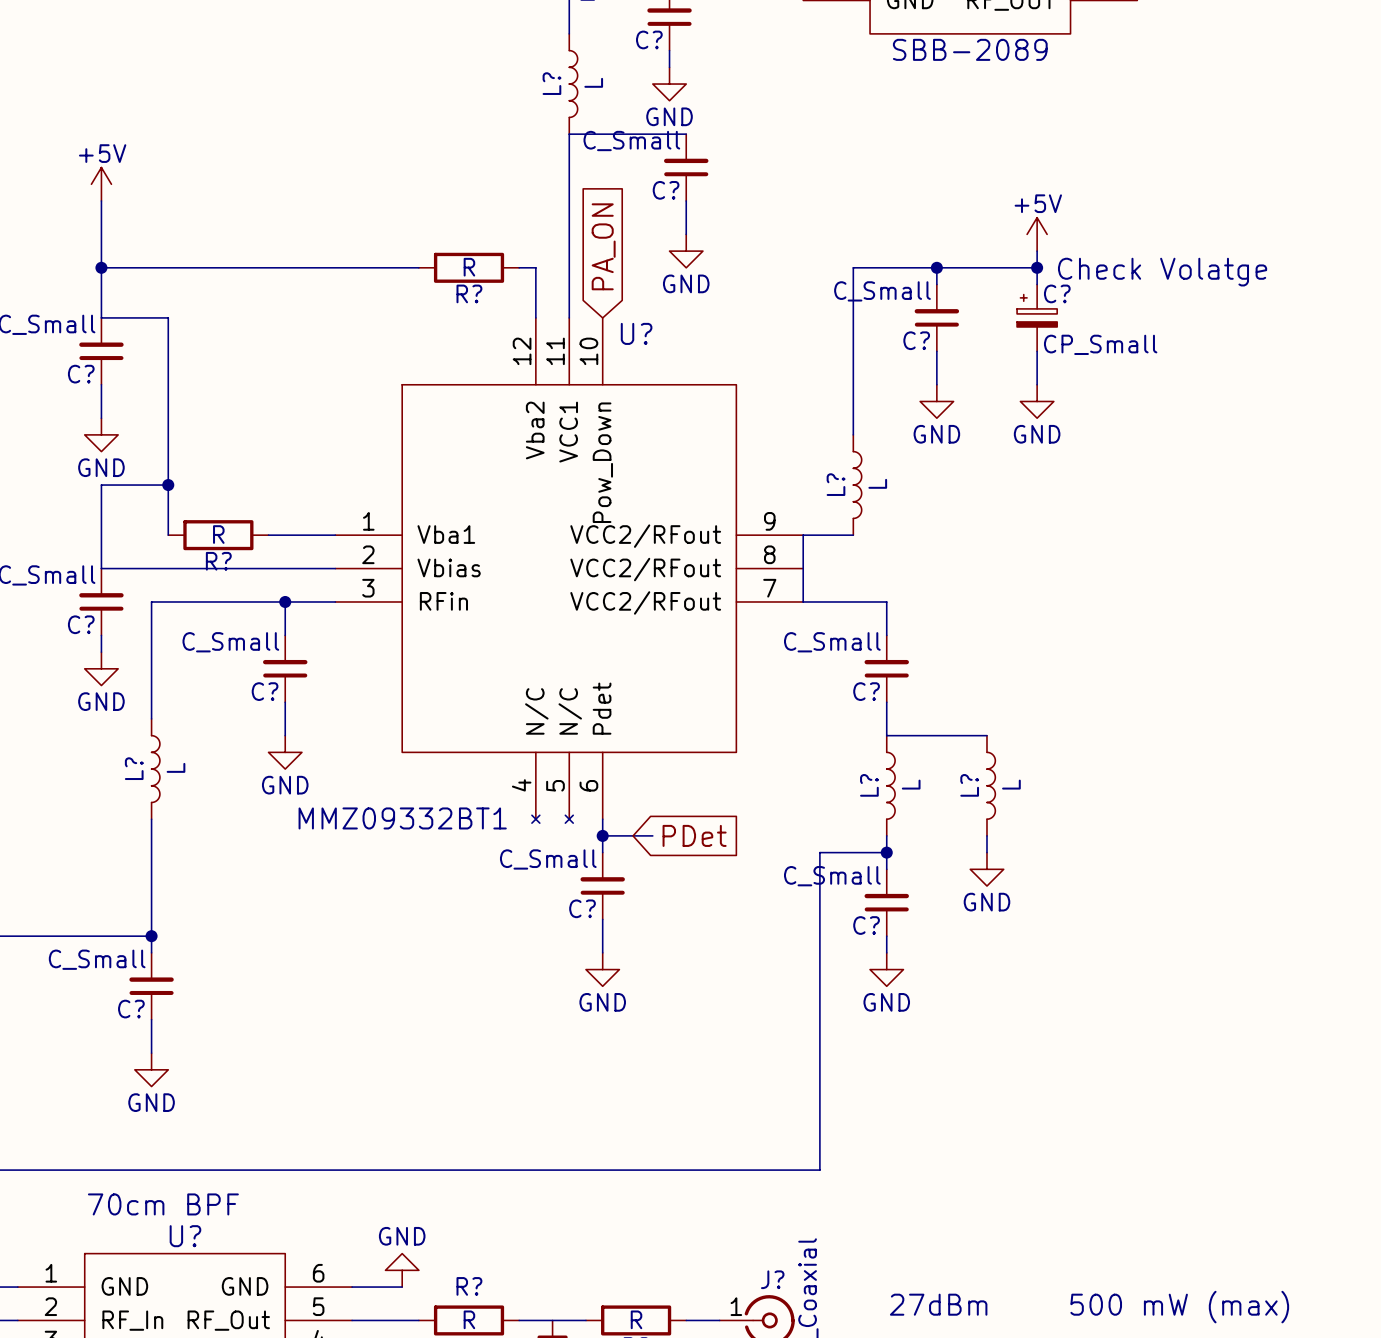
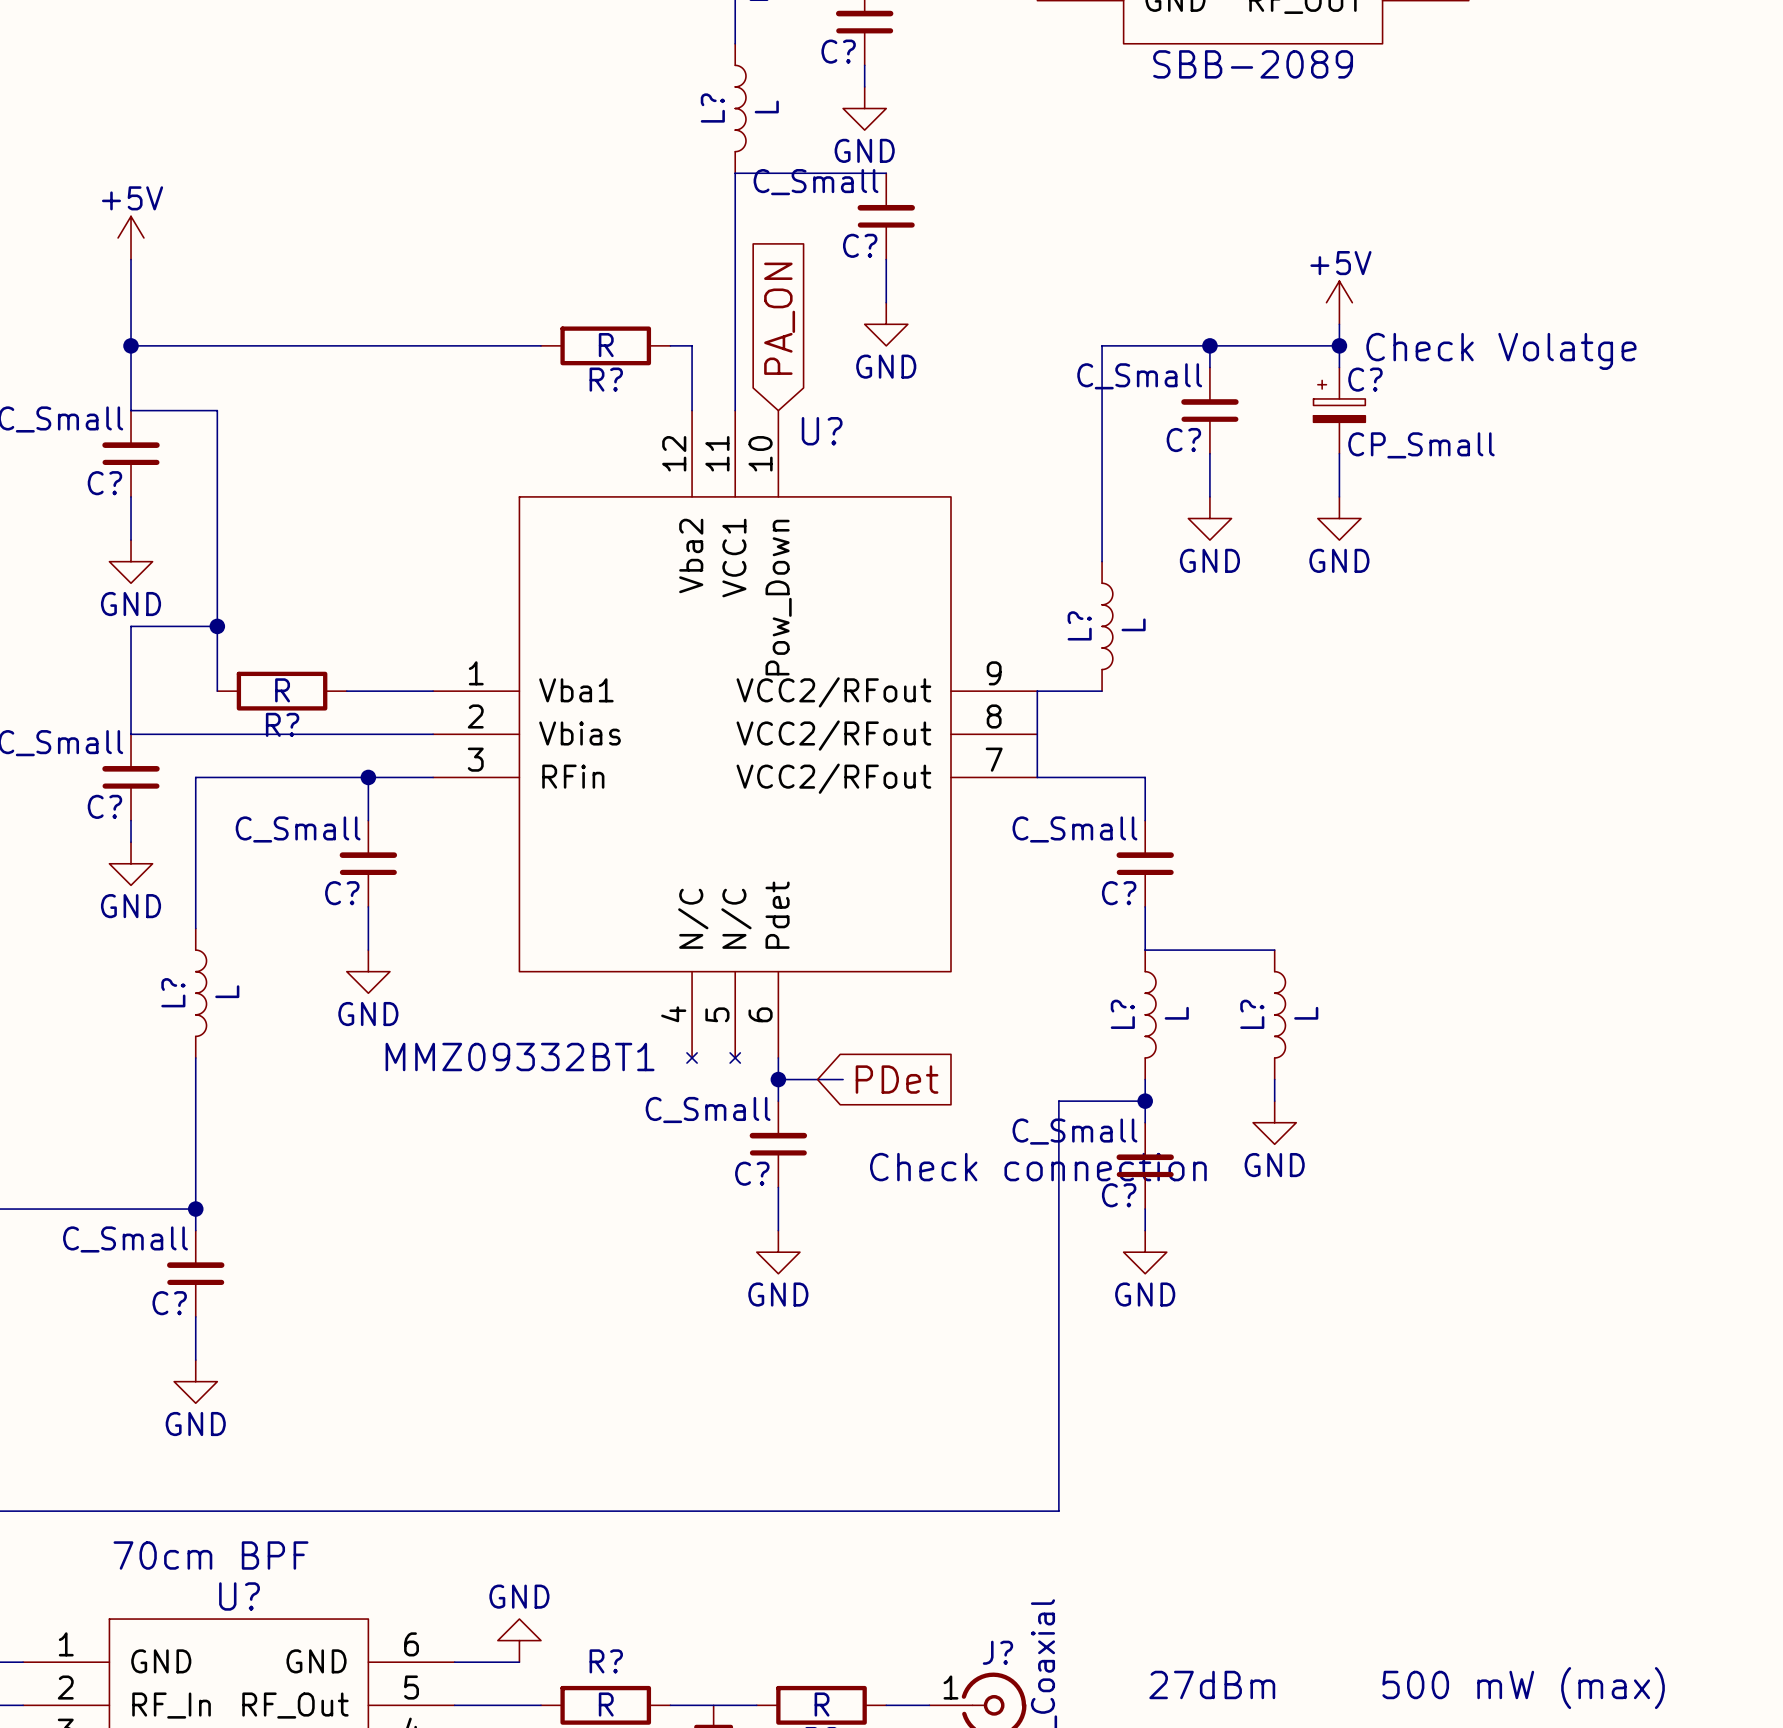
text: none -> Check connection (1038, 1167)

